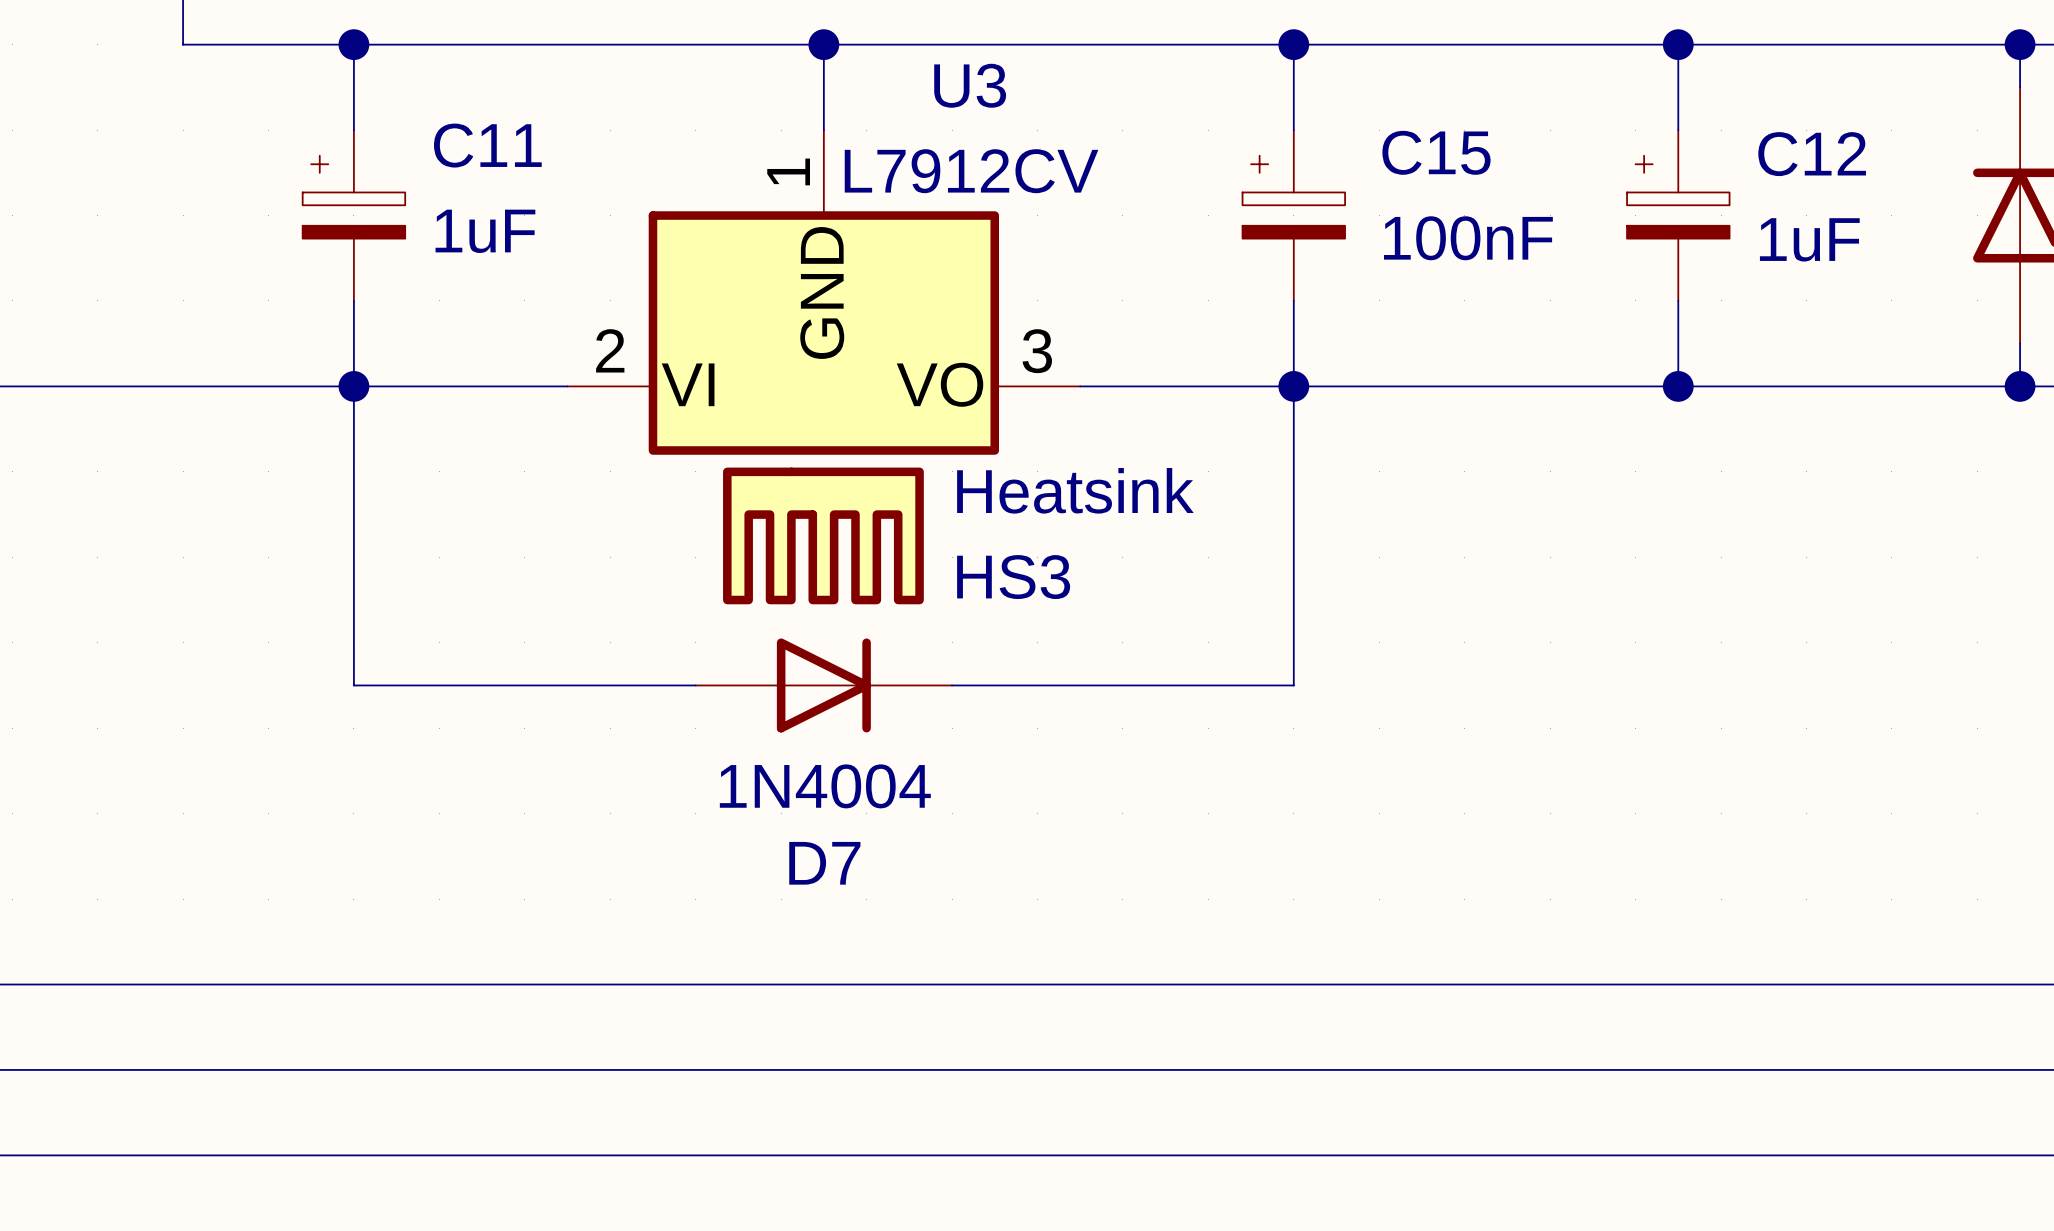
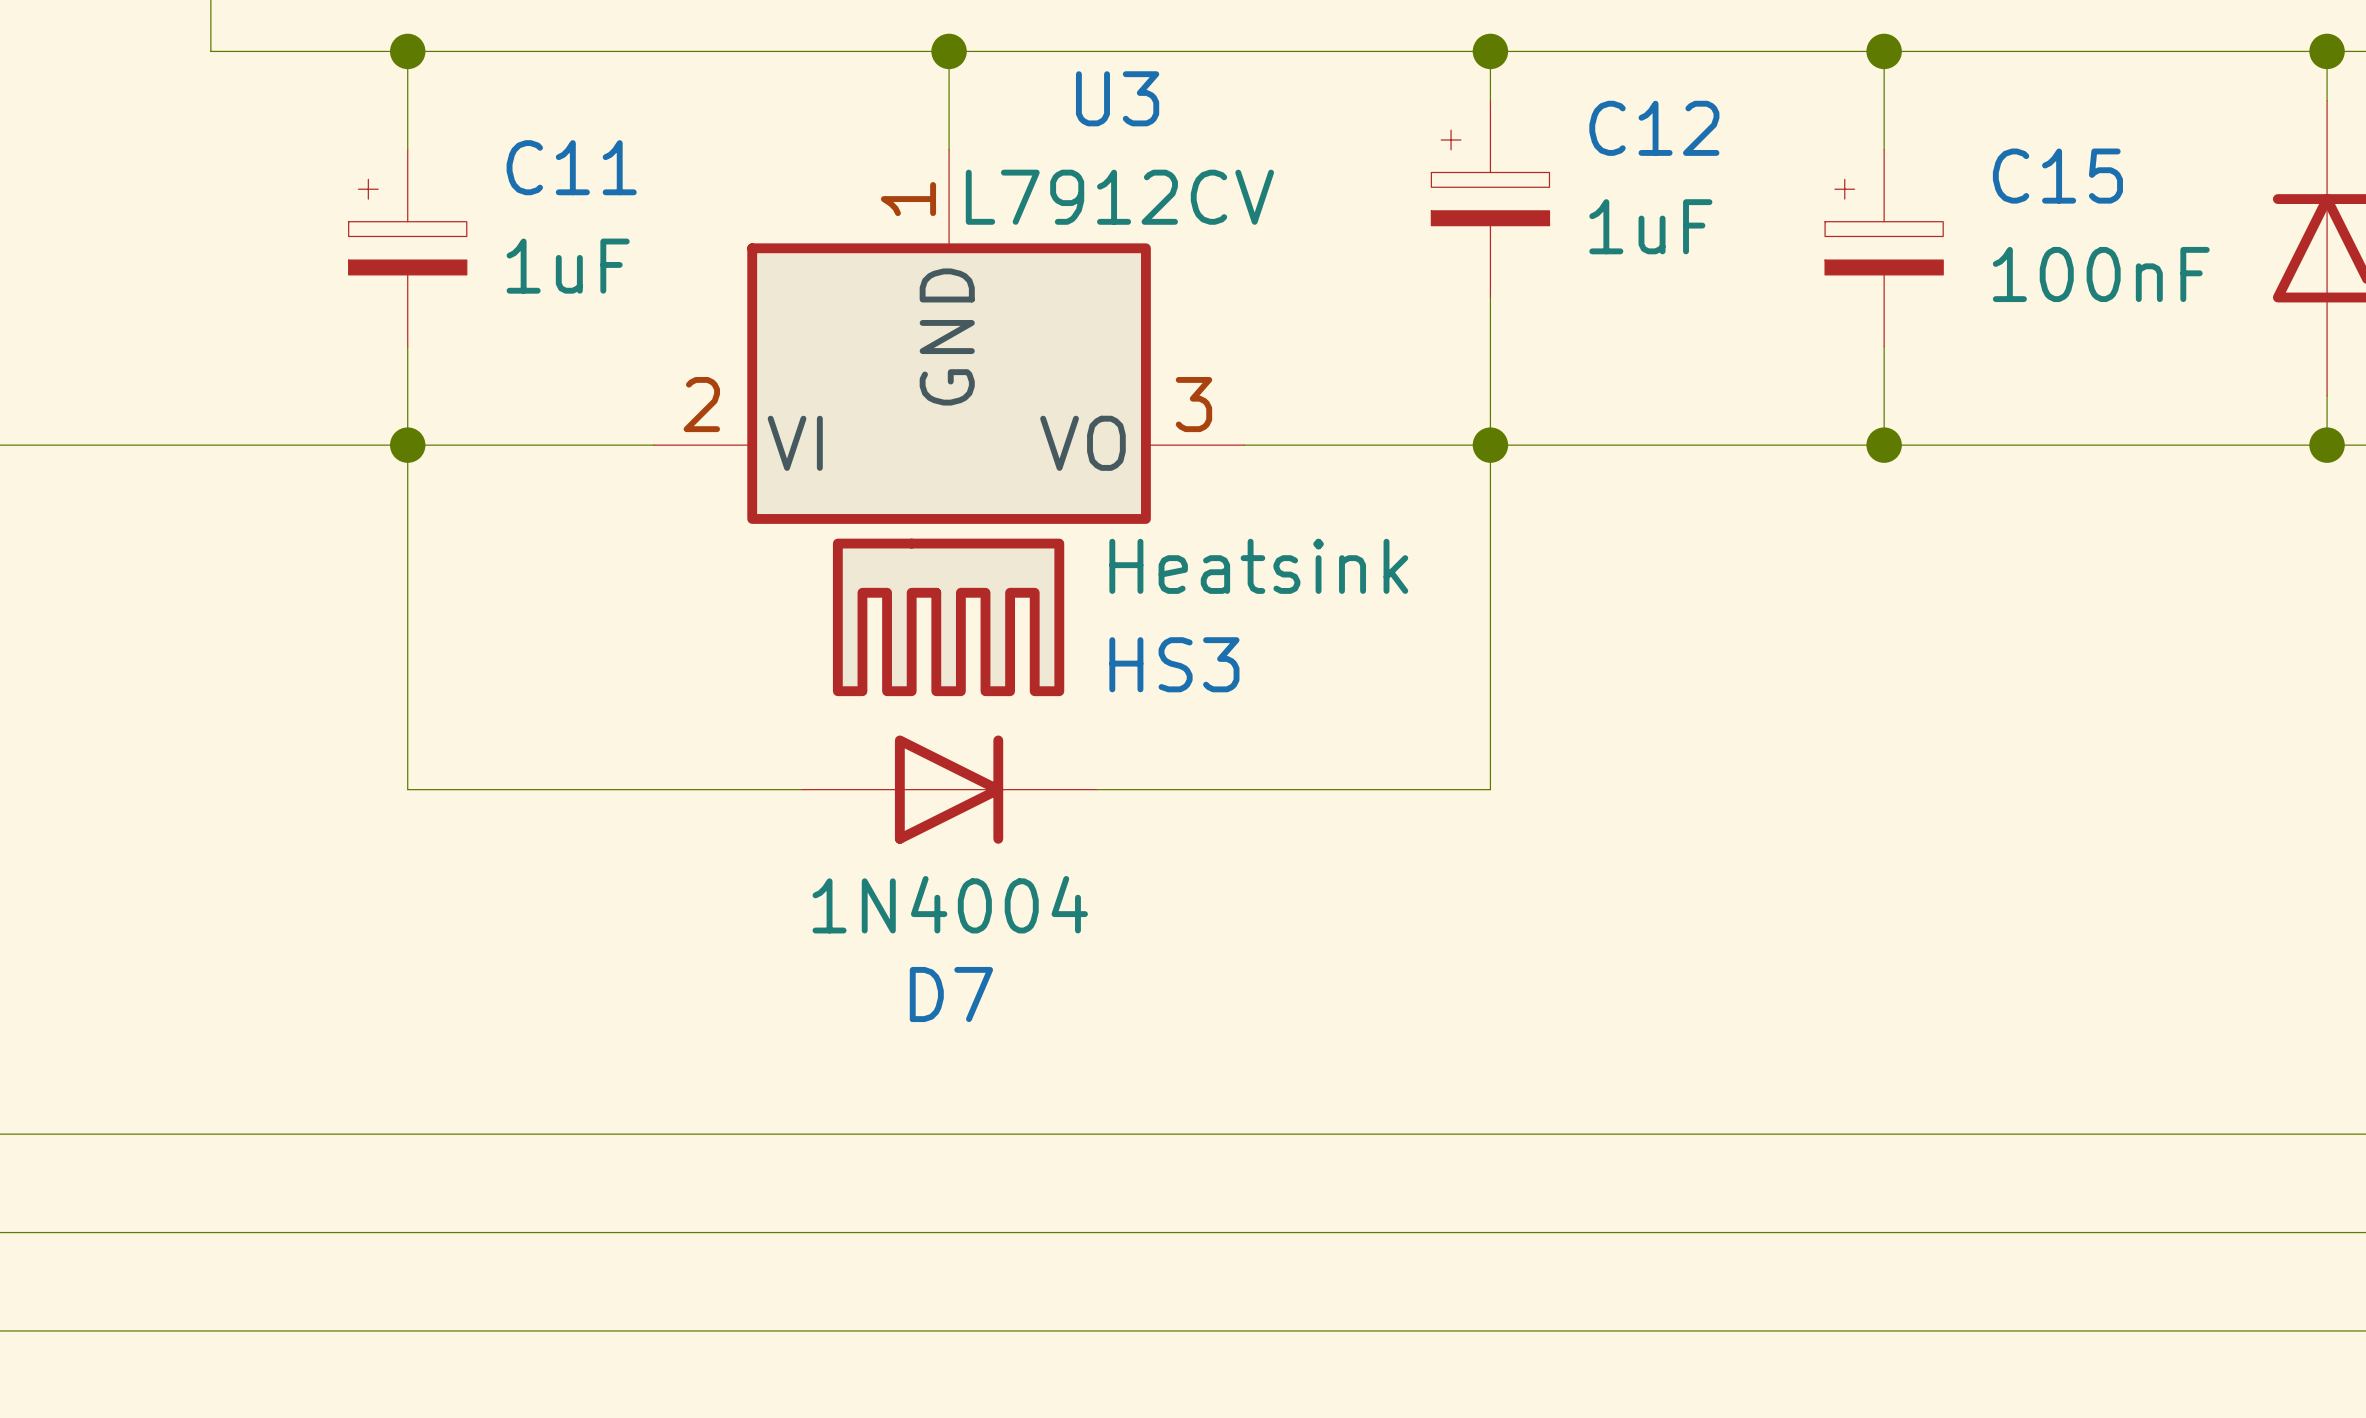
wire: (1678, 44) (1678, 130) -> (1884, 51) (1884, 149)
junction position: (1678, 44) -> (1884, 51)
C15 position: (1293, 215) -> (1884, 248)
C12 position: (1678, 215) -> (1490, 199)
wire: (1678, 300) (1678, 386) -> (1884, 346) (1884, 445)
junction position: (1678, 386) -> (1884, 445)

